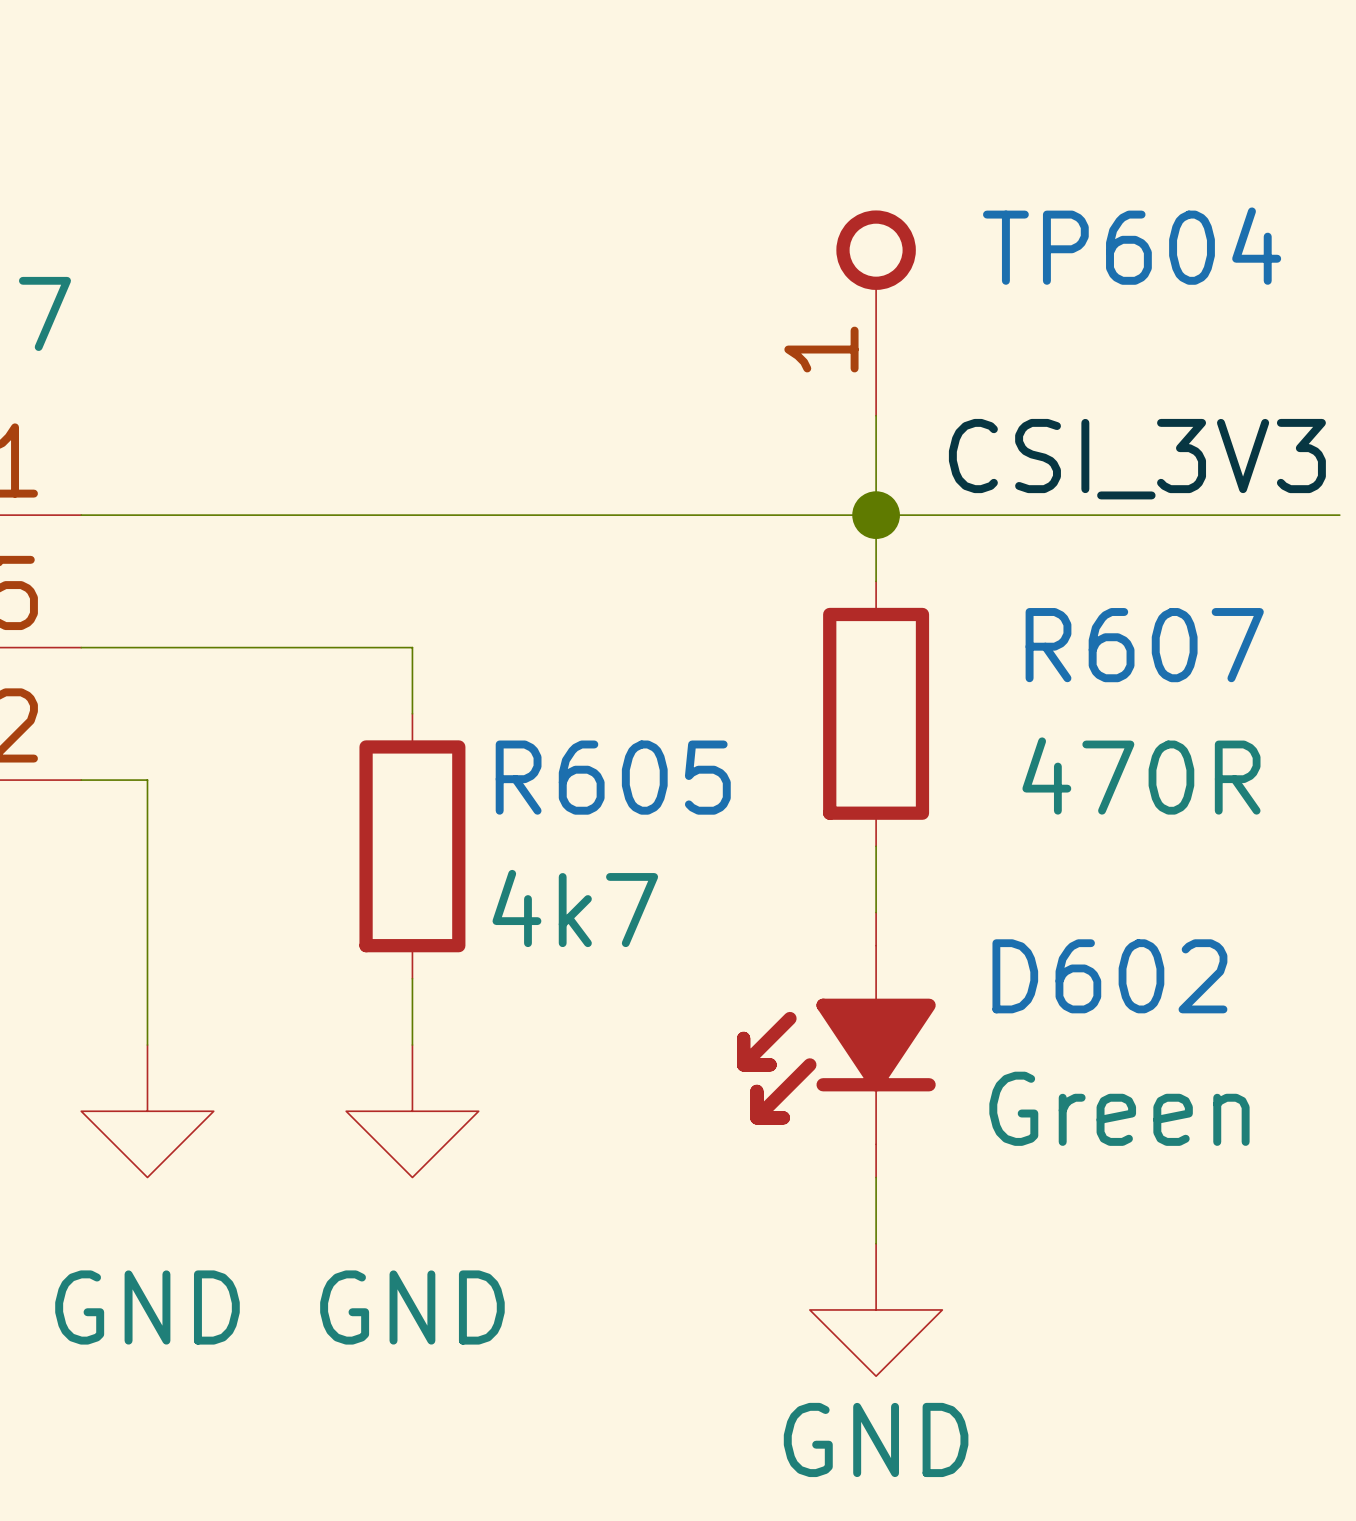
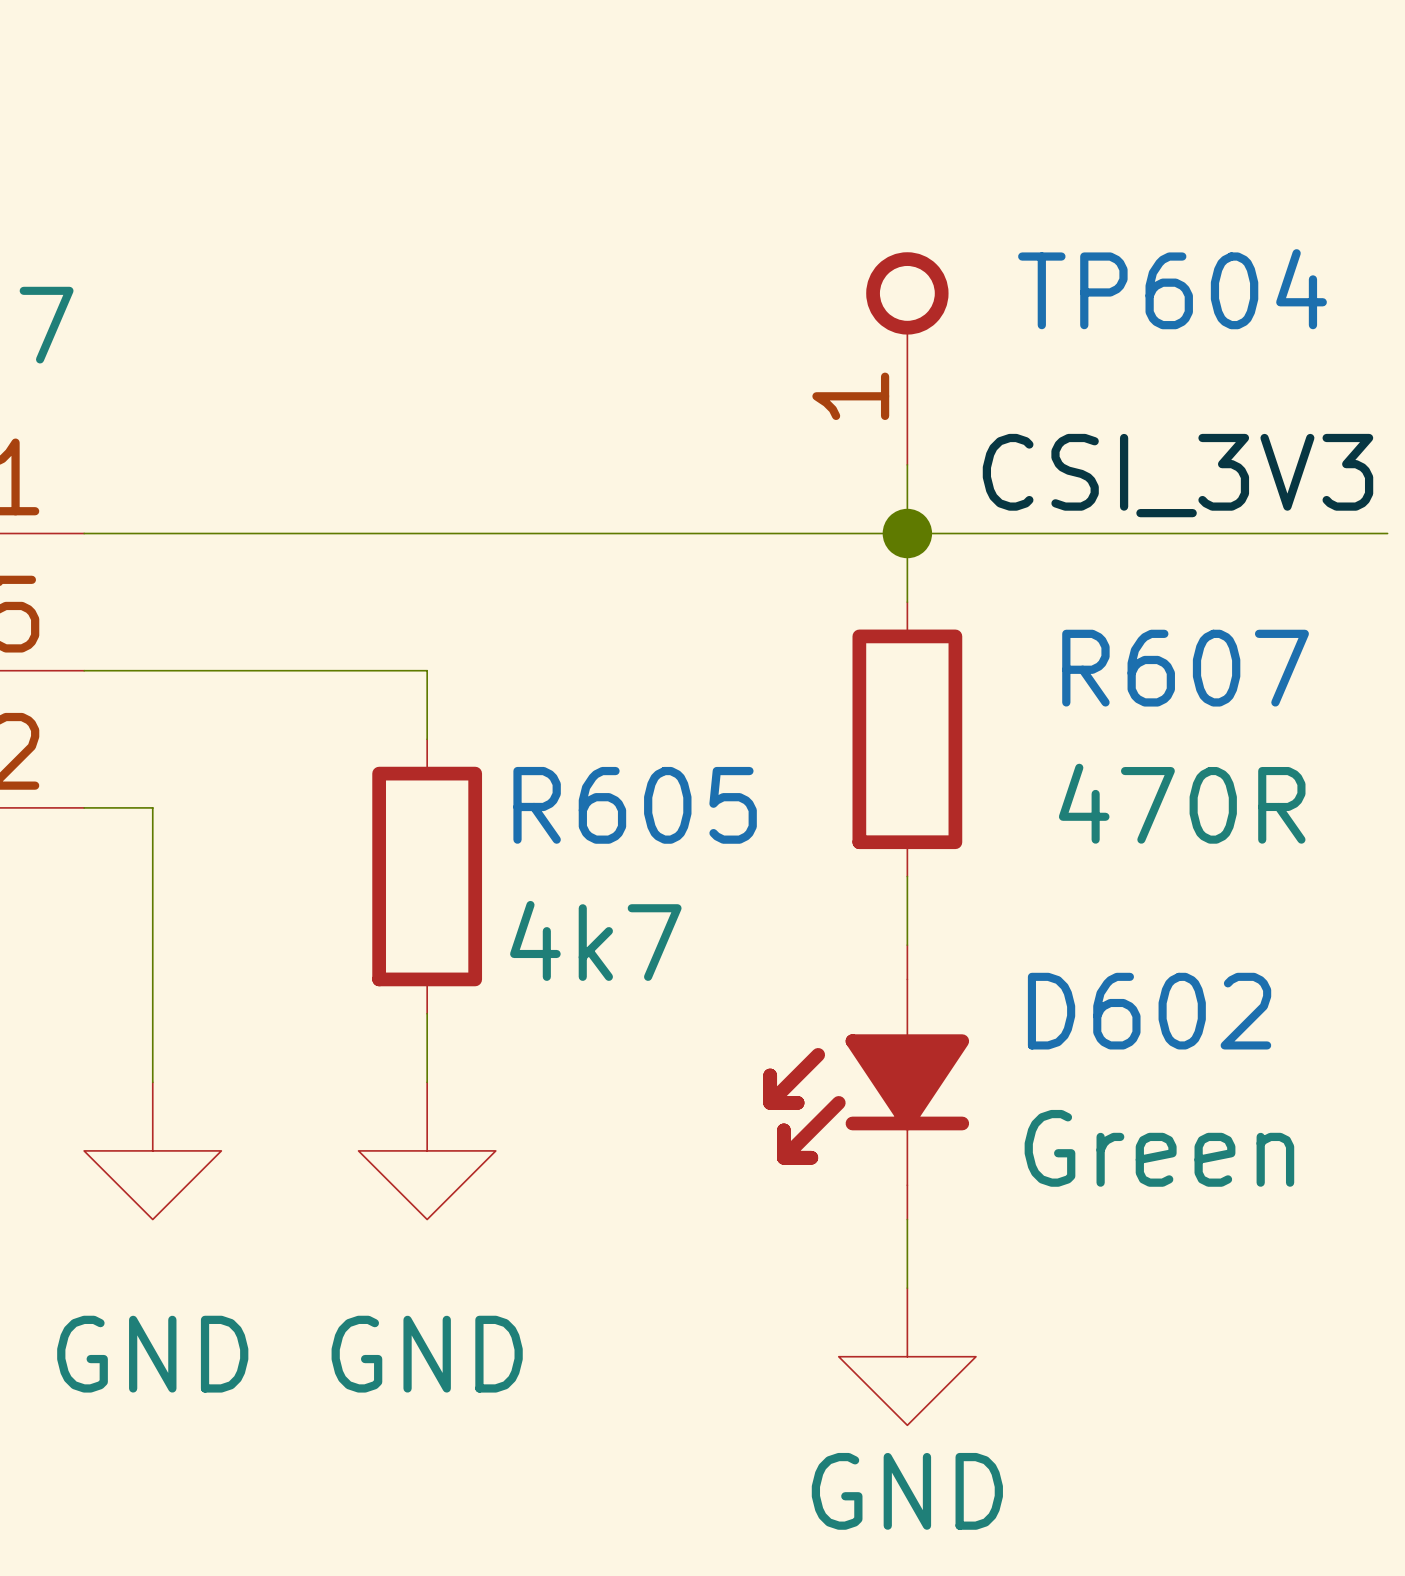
TP604 position: (876, 313) -> (907, 358)

